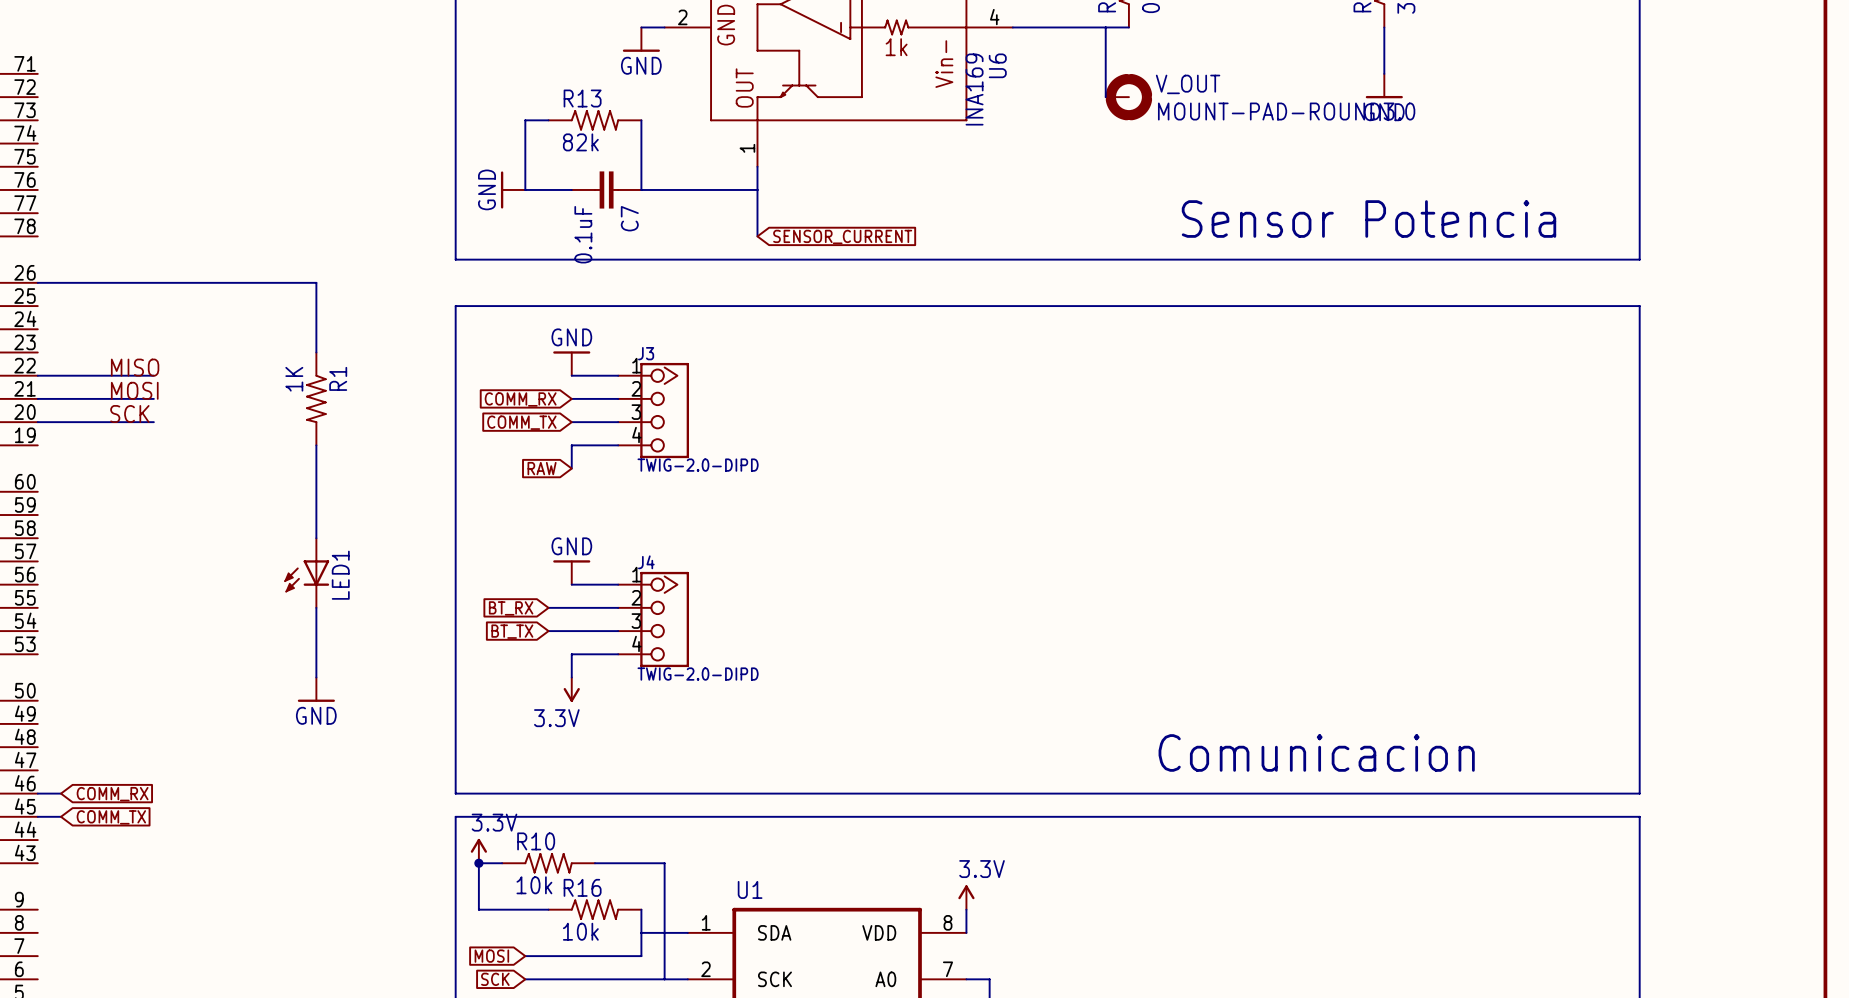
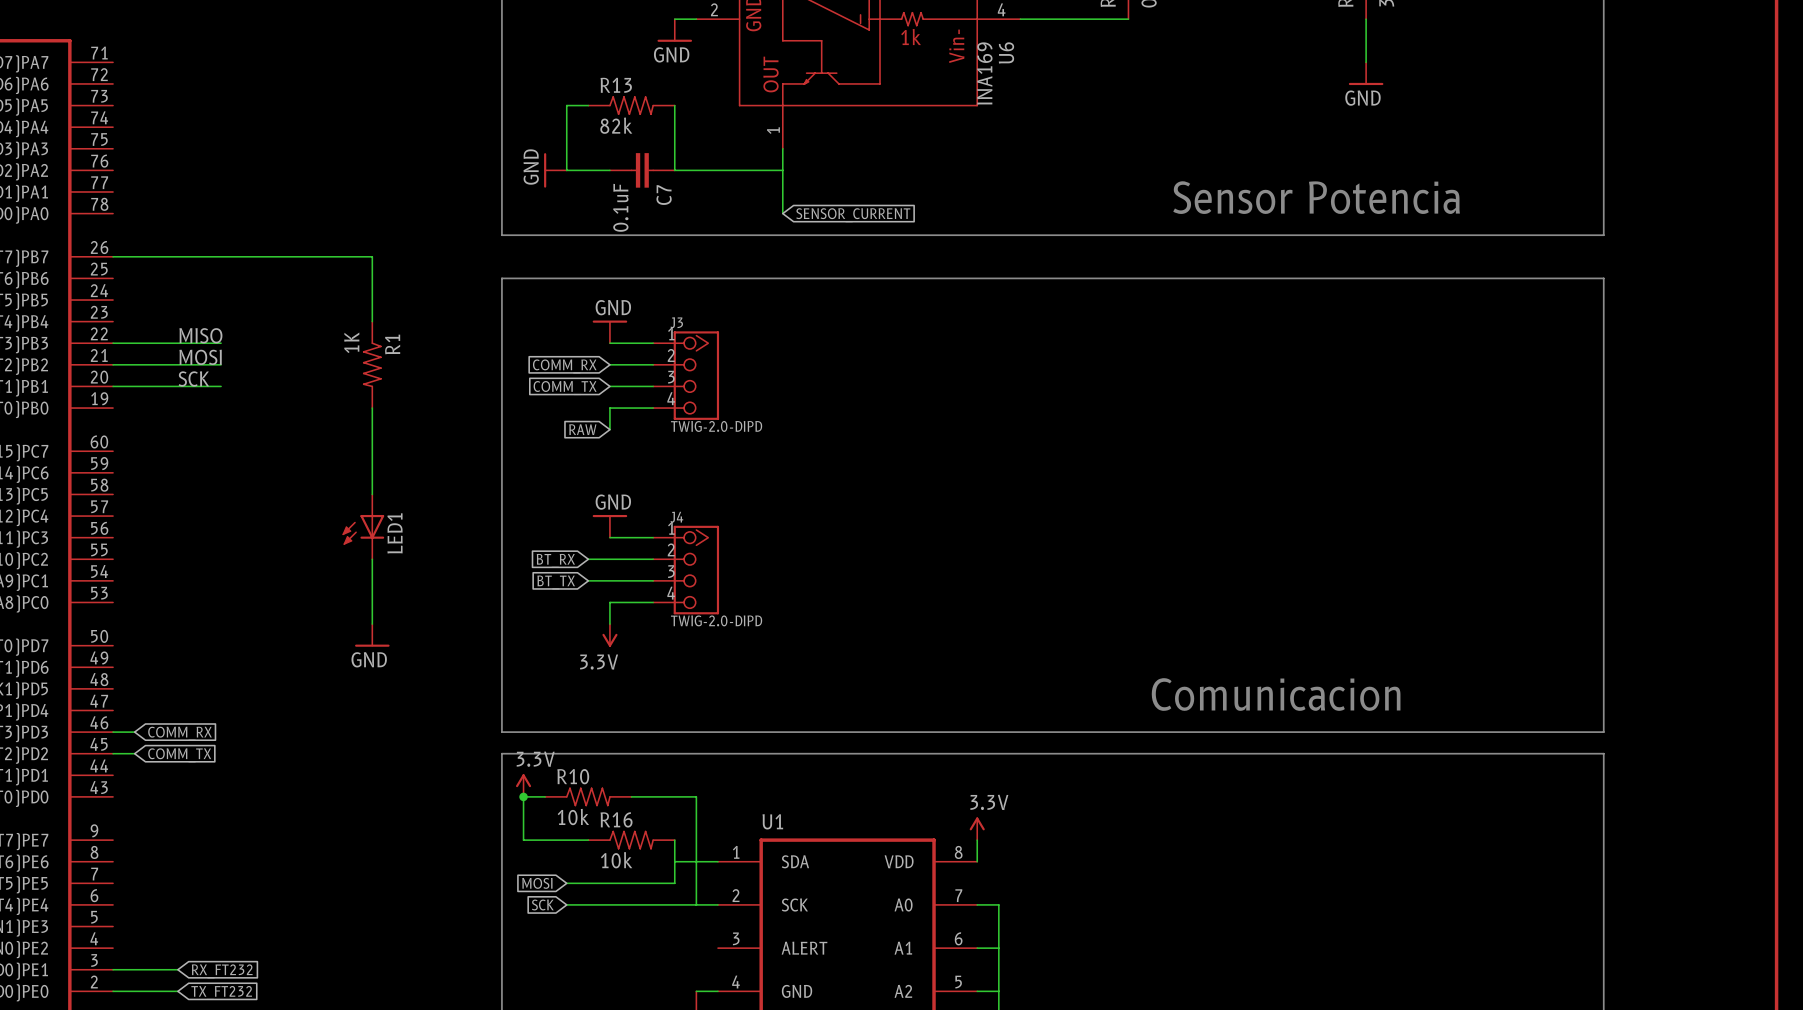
wire: (1105, 27) (1105, 97) -> none
V_OUT: MOUNT-PAD-ROUND3.0 (1128, 97) -> none

